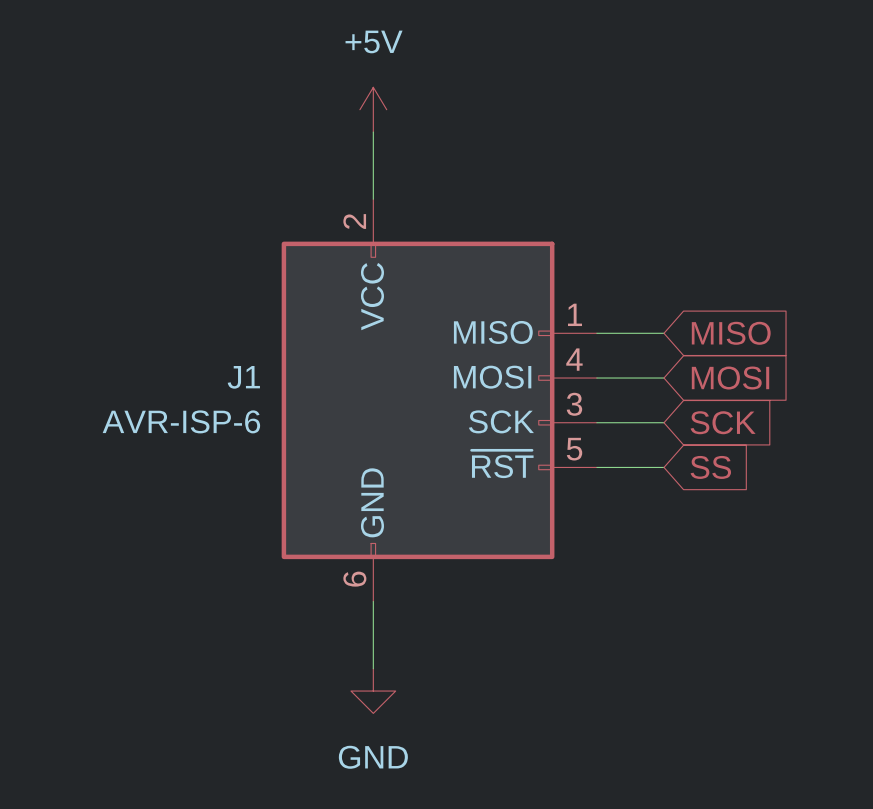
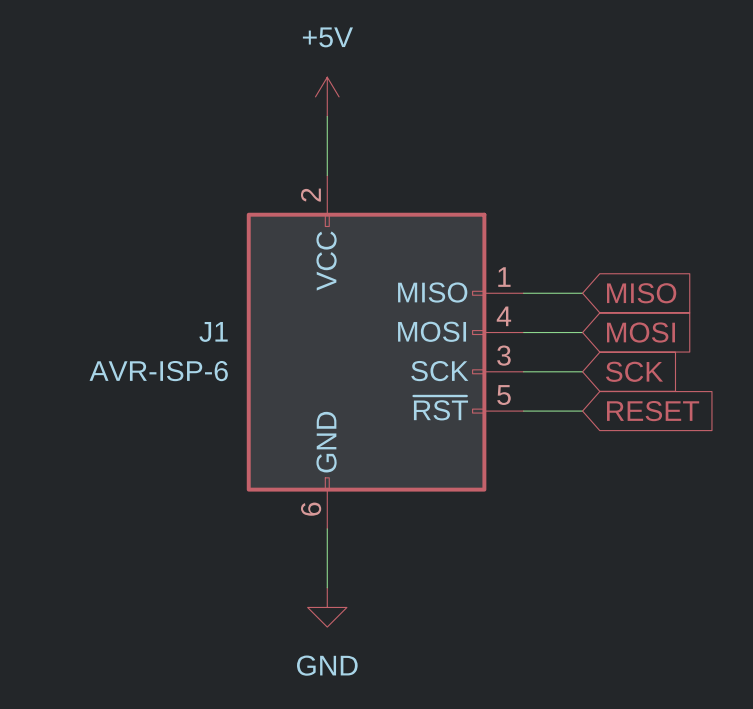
global label: SS (710, 467) -> RESET (653, 411)

